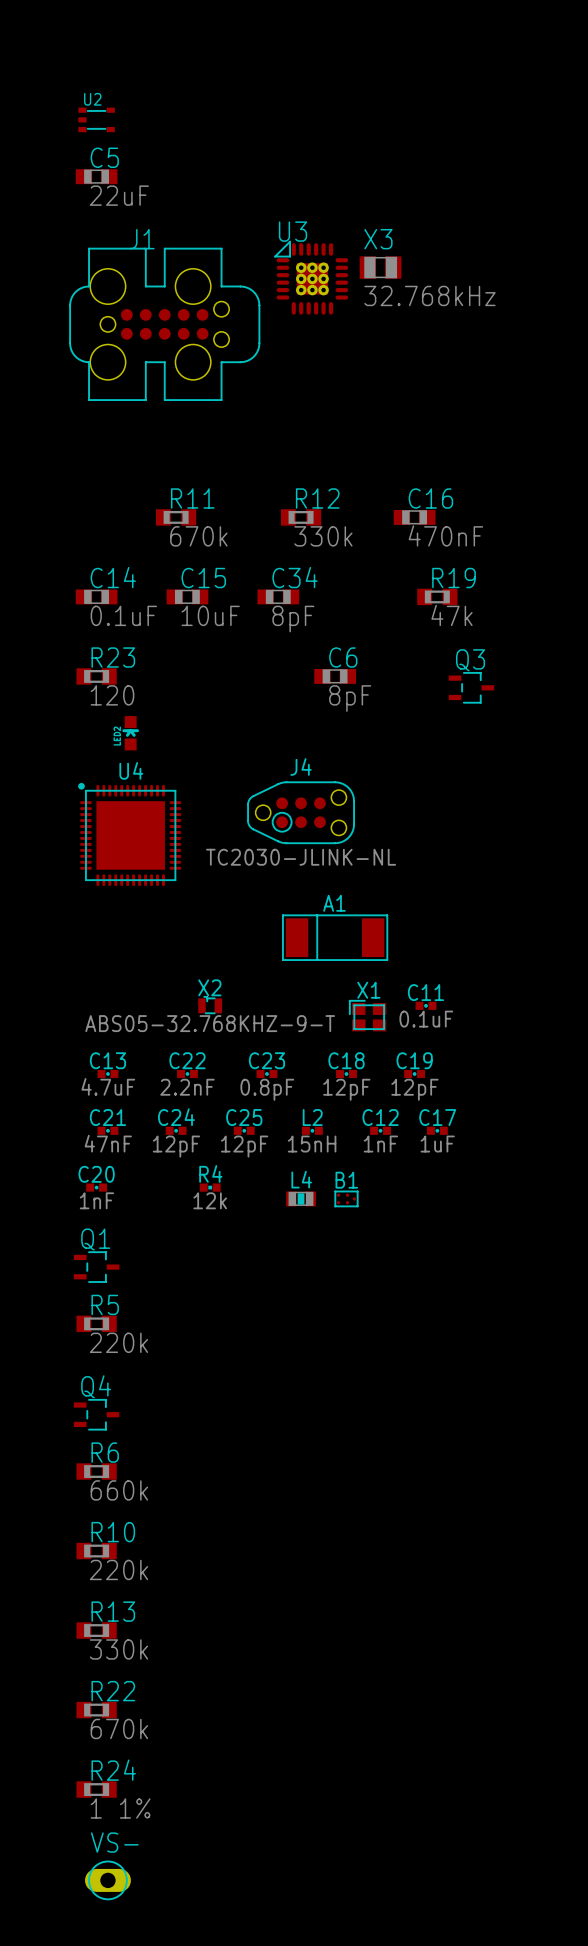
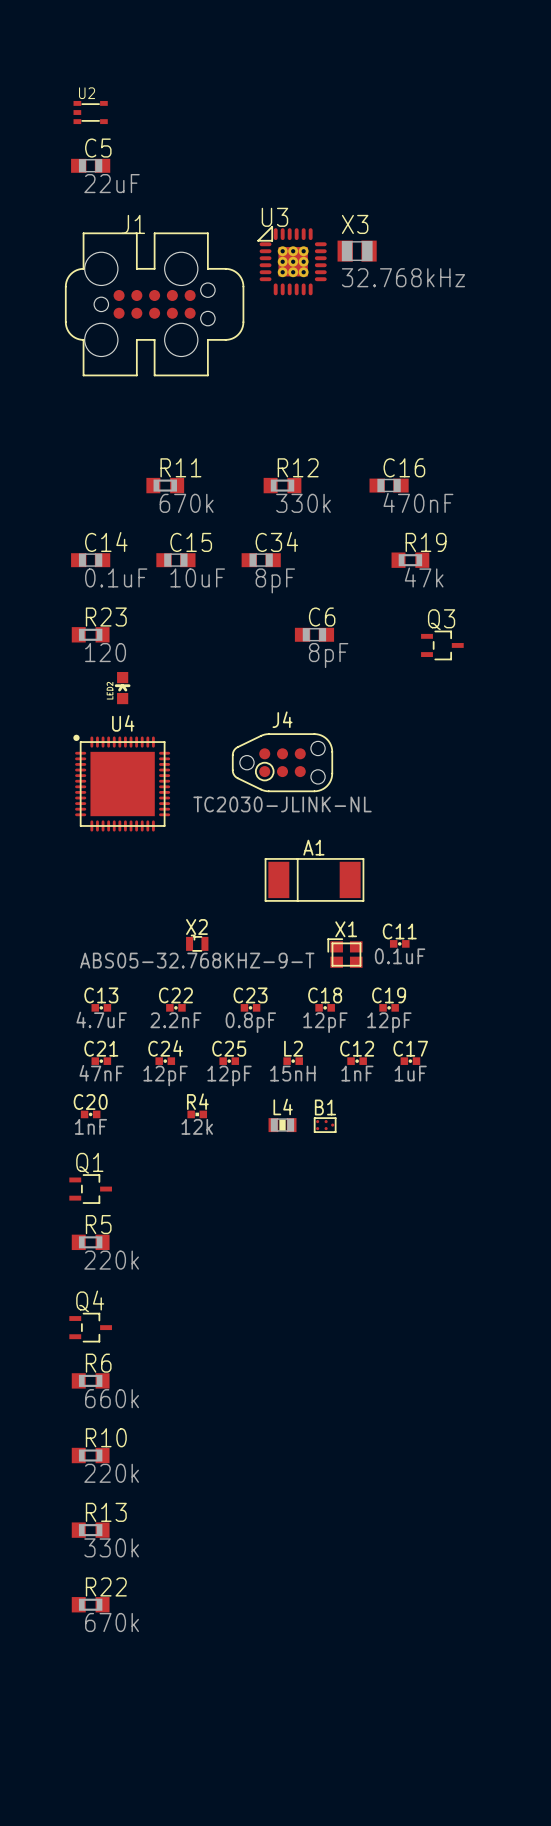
R24: 1 1% (96, 1789) -> none
VS-: (107, 1880) -> none

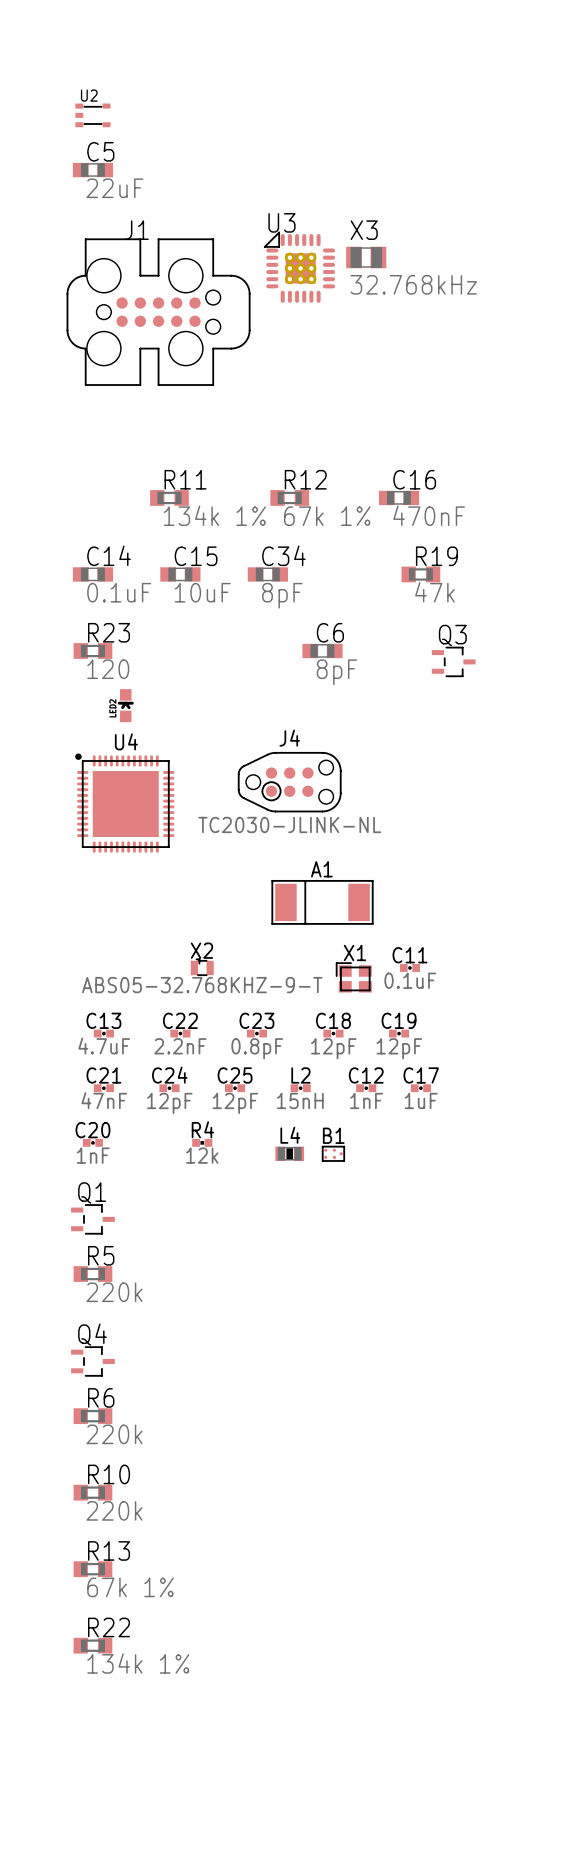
R11 value: 670k (186, 503) -> 134k 1% (214, 515)
R12 value: 330k (303, 503) -> 67k 1% (327, 516)
R6 value: 660k (112, 1398) -> 220k (114, 1434)
R13 value: 330k (111, 1547) -> 67k 1% (130, 1587)
R22 value: 670k (112, 1622) -> 134k 1% (138, 1663)

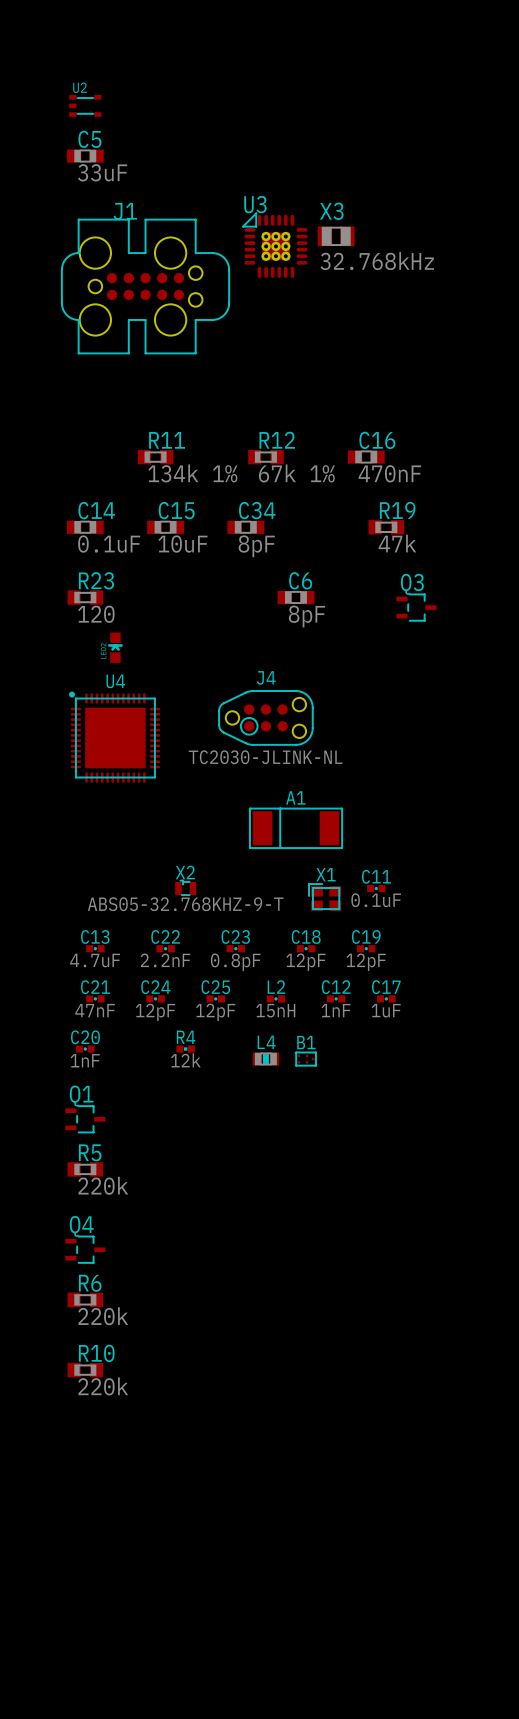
C5 value: 22uF (114, 188) -> 33uF (102, 172)
R13: 67k 1% (92, 1569) -> none
R22: 134k 1% (92, 1645) -> none

